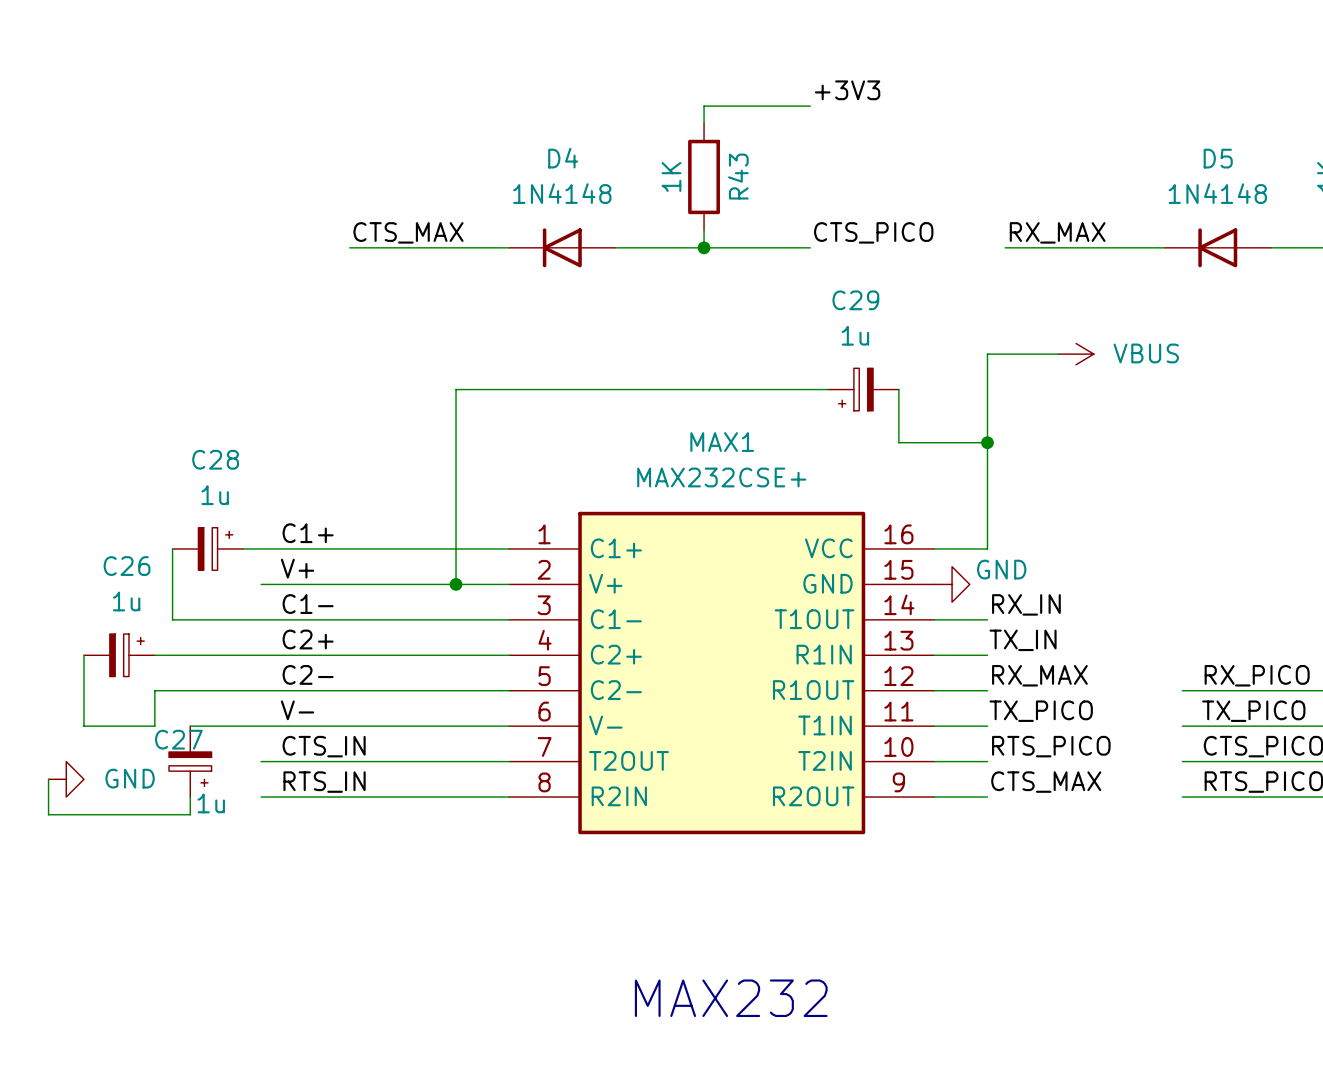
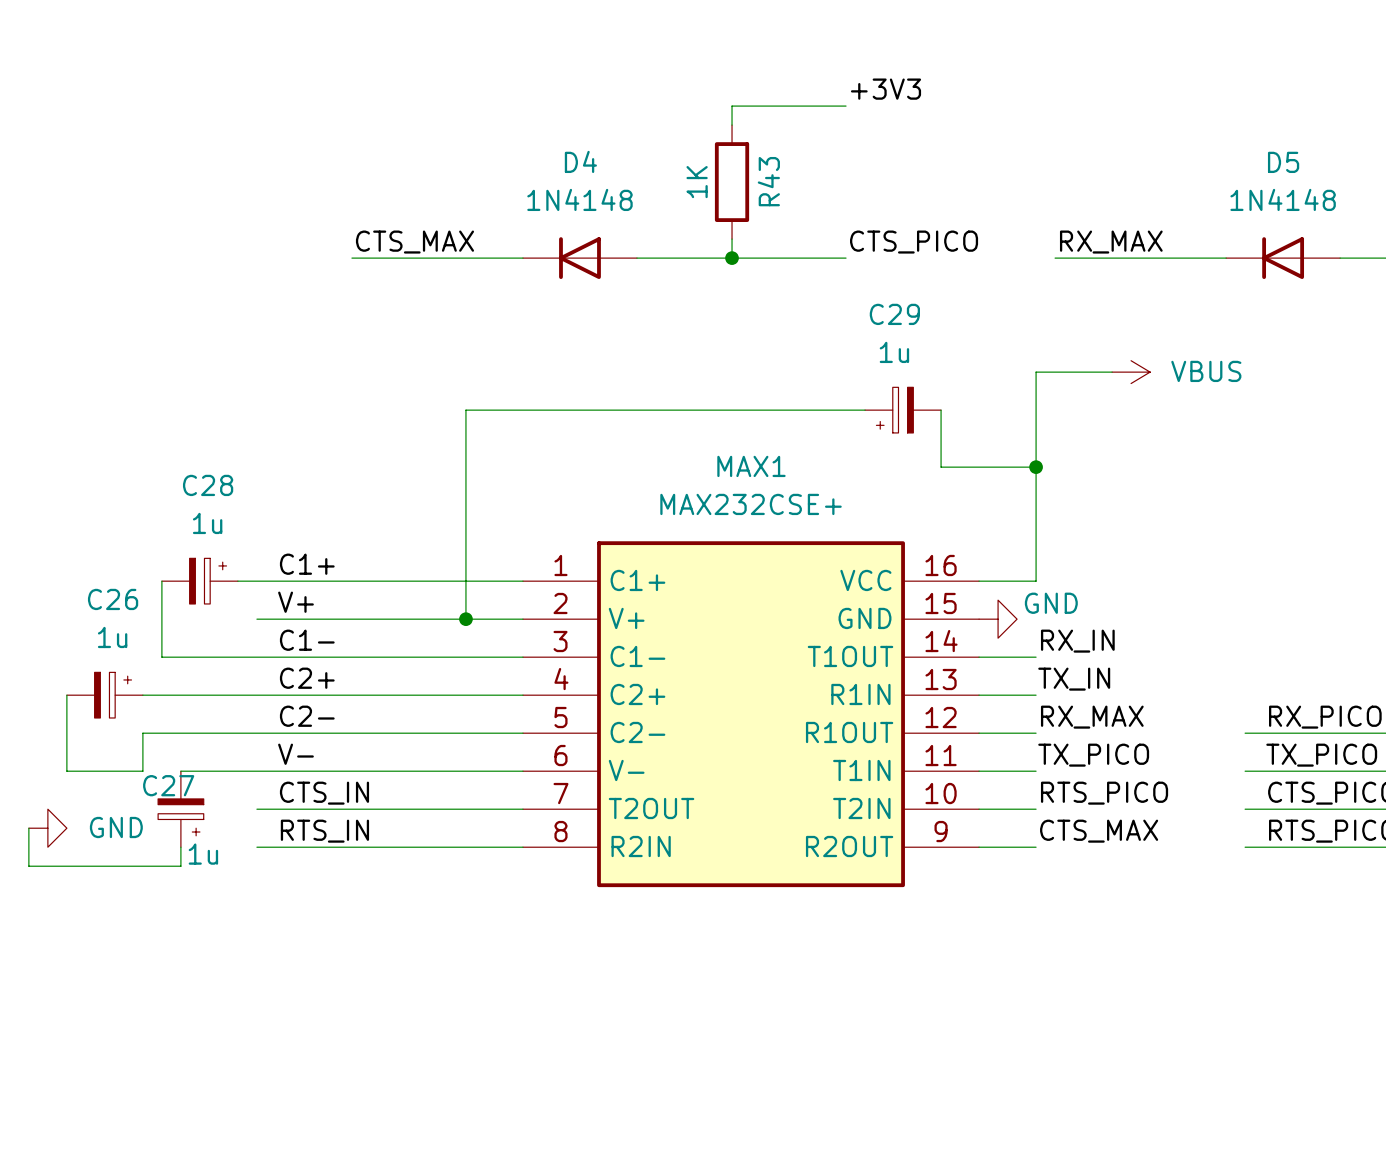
text: MAX232 (731, 998) -> none

